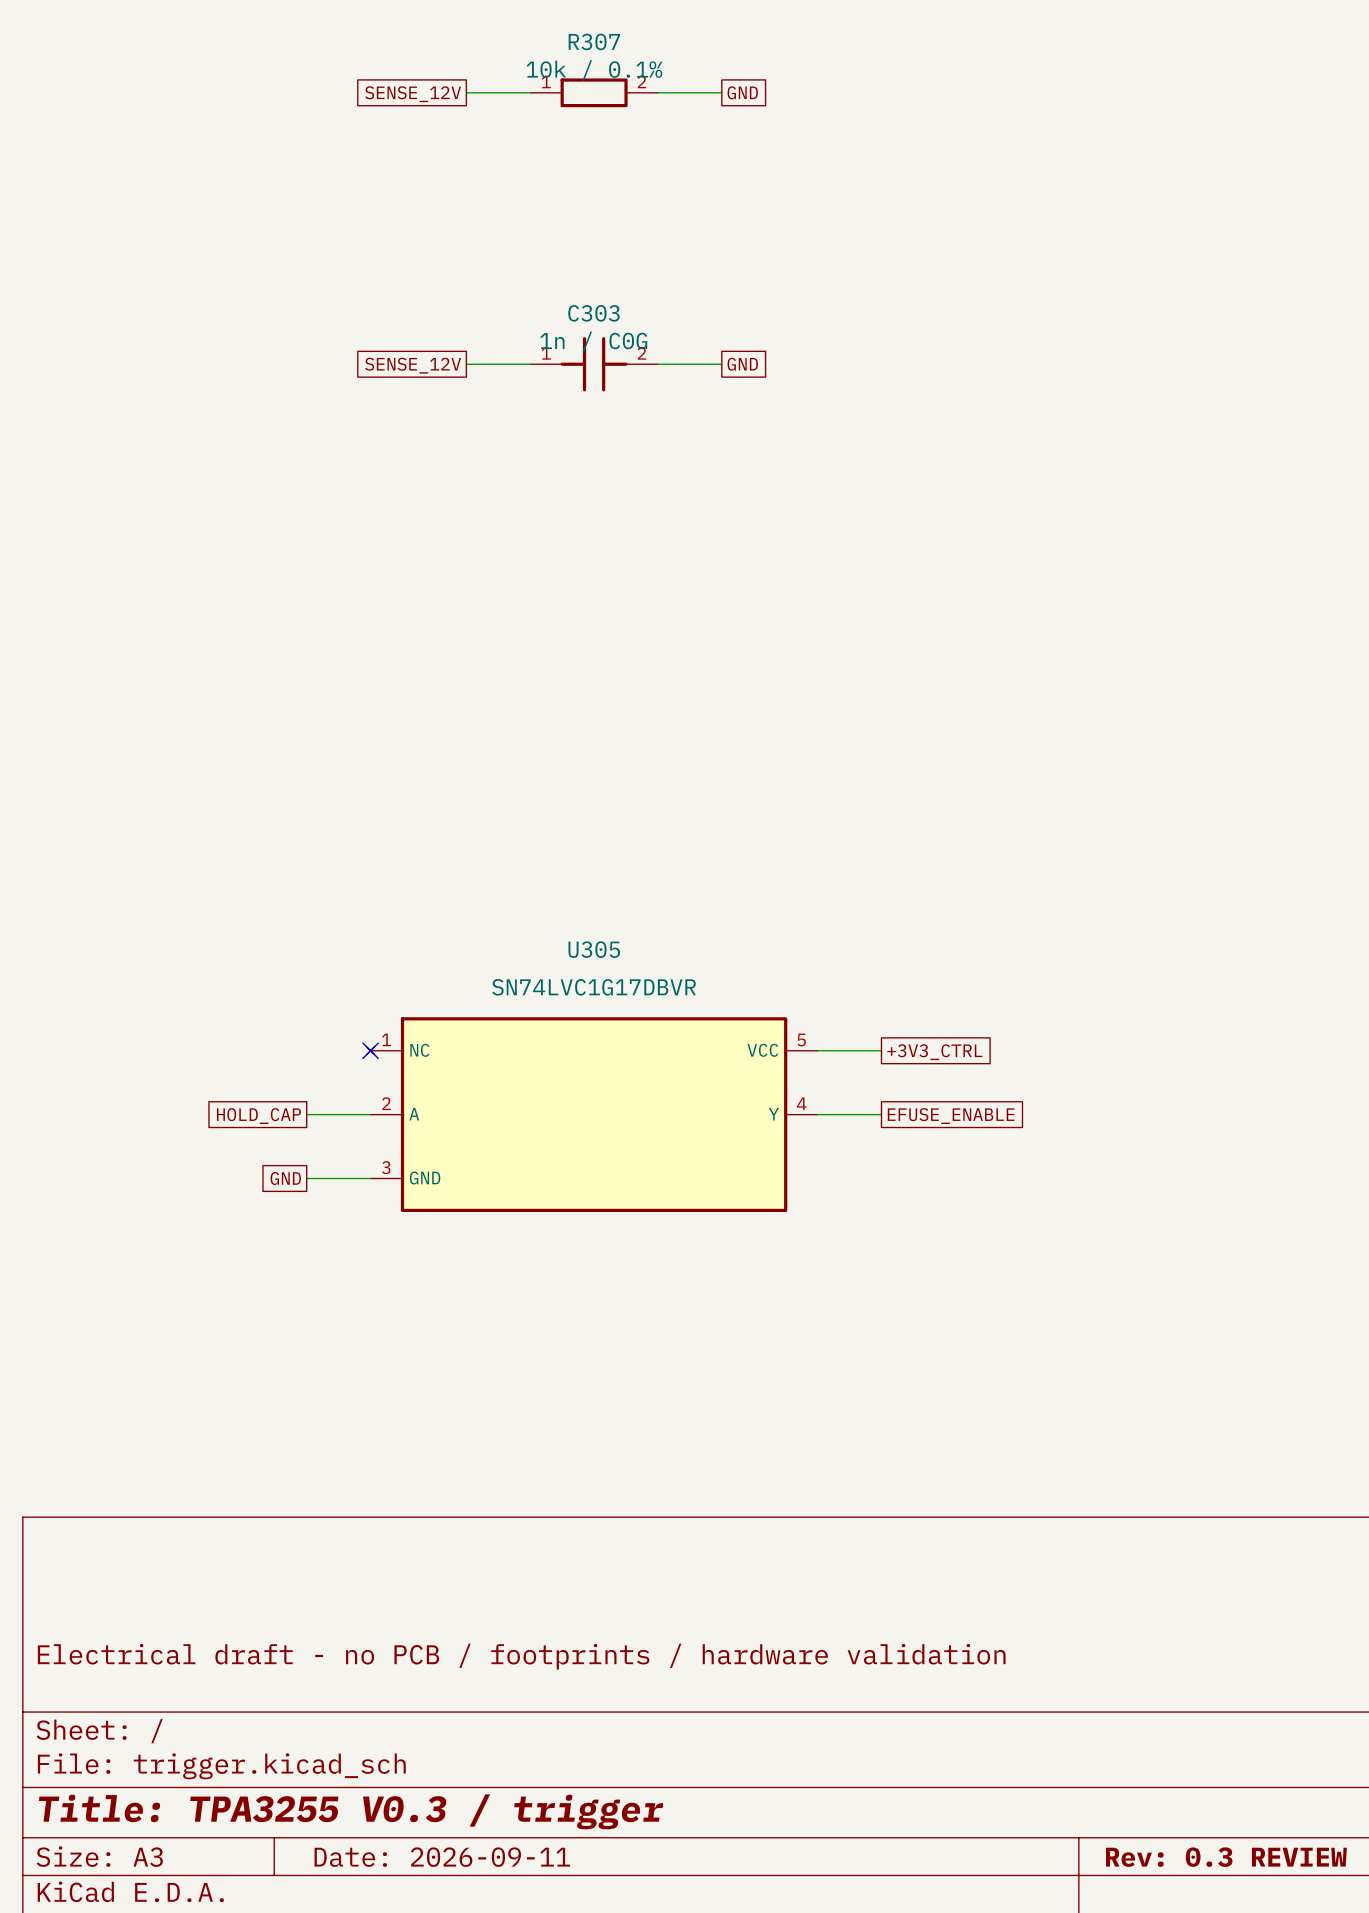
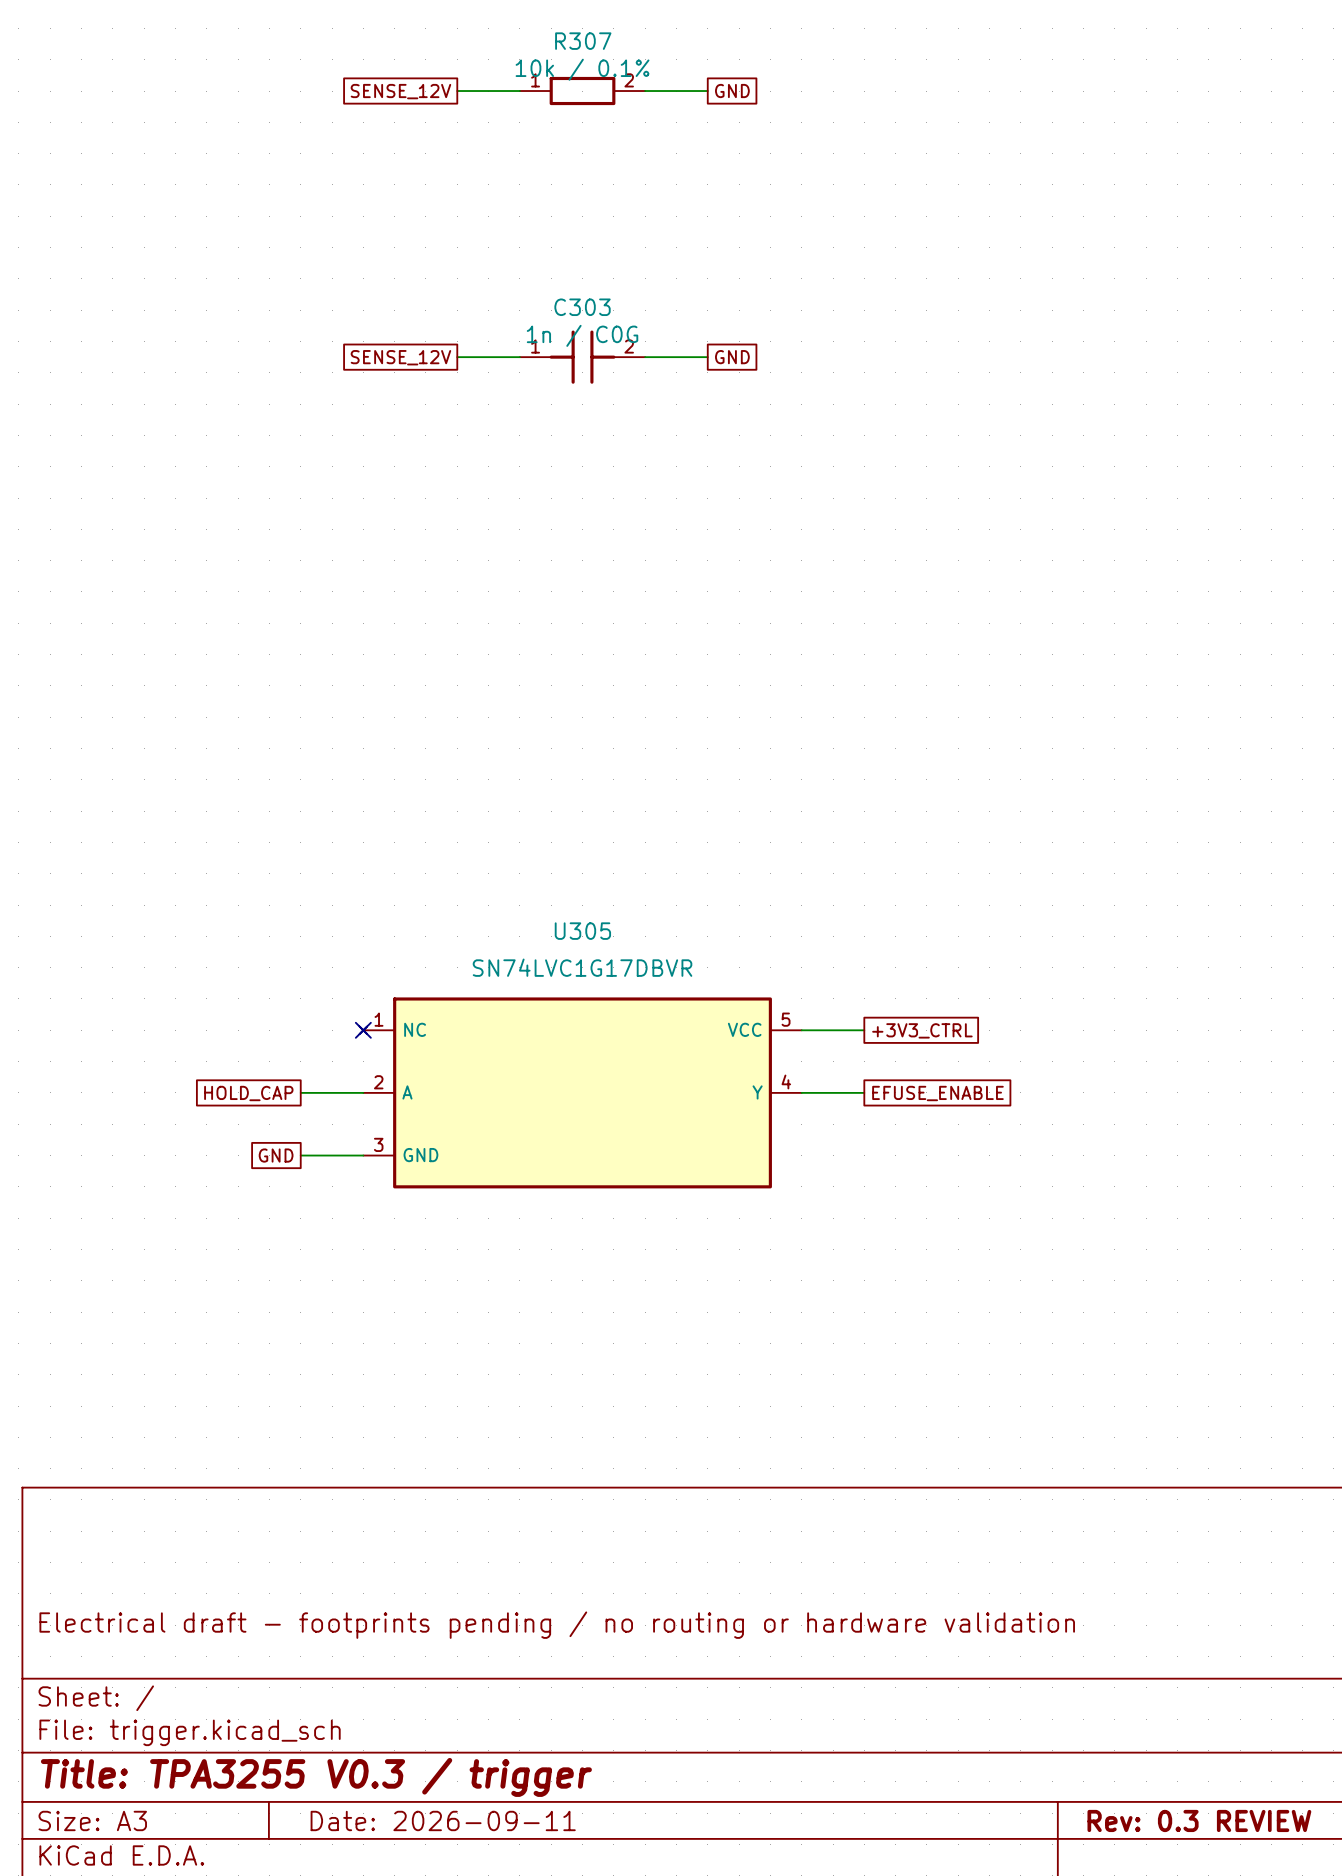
title block: Electrical draft - no PCB / footprints / hardware validation (521, 1656) -> Electrical draft - footprints pending / no routing or hardware validation (557, 1625)

